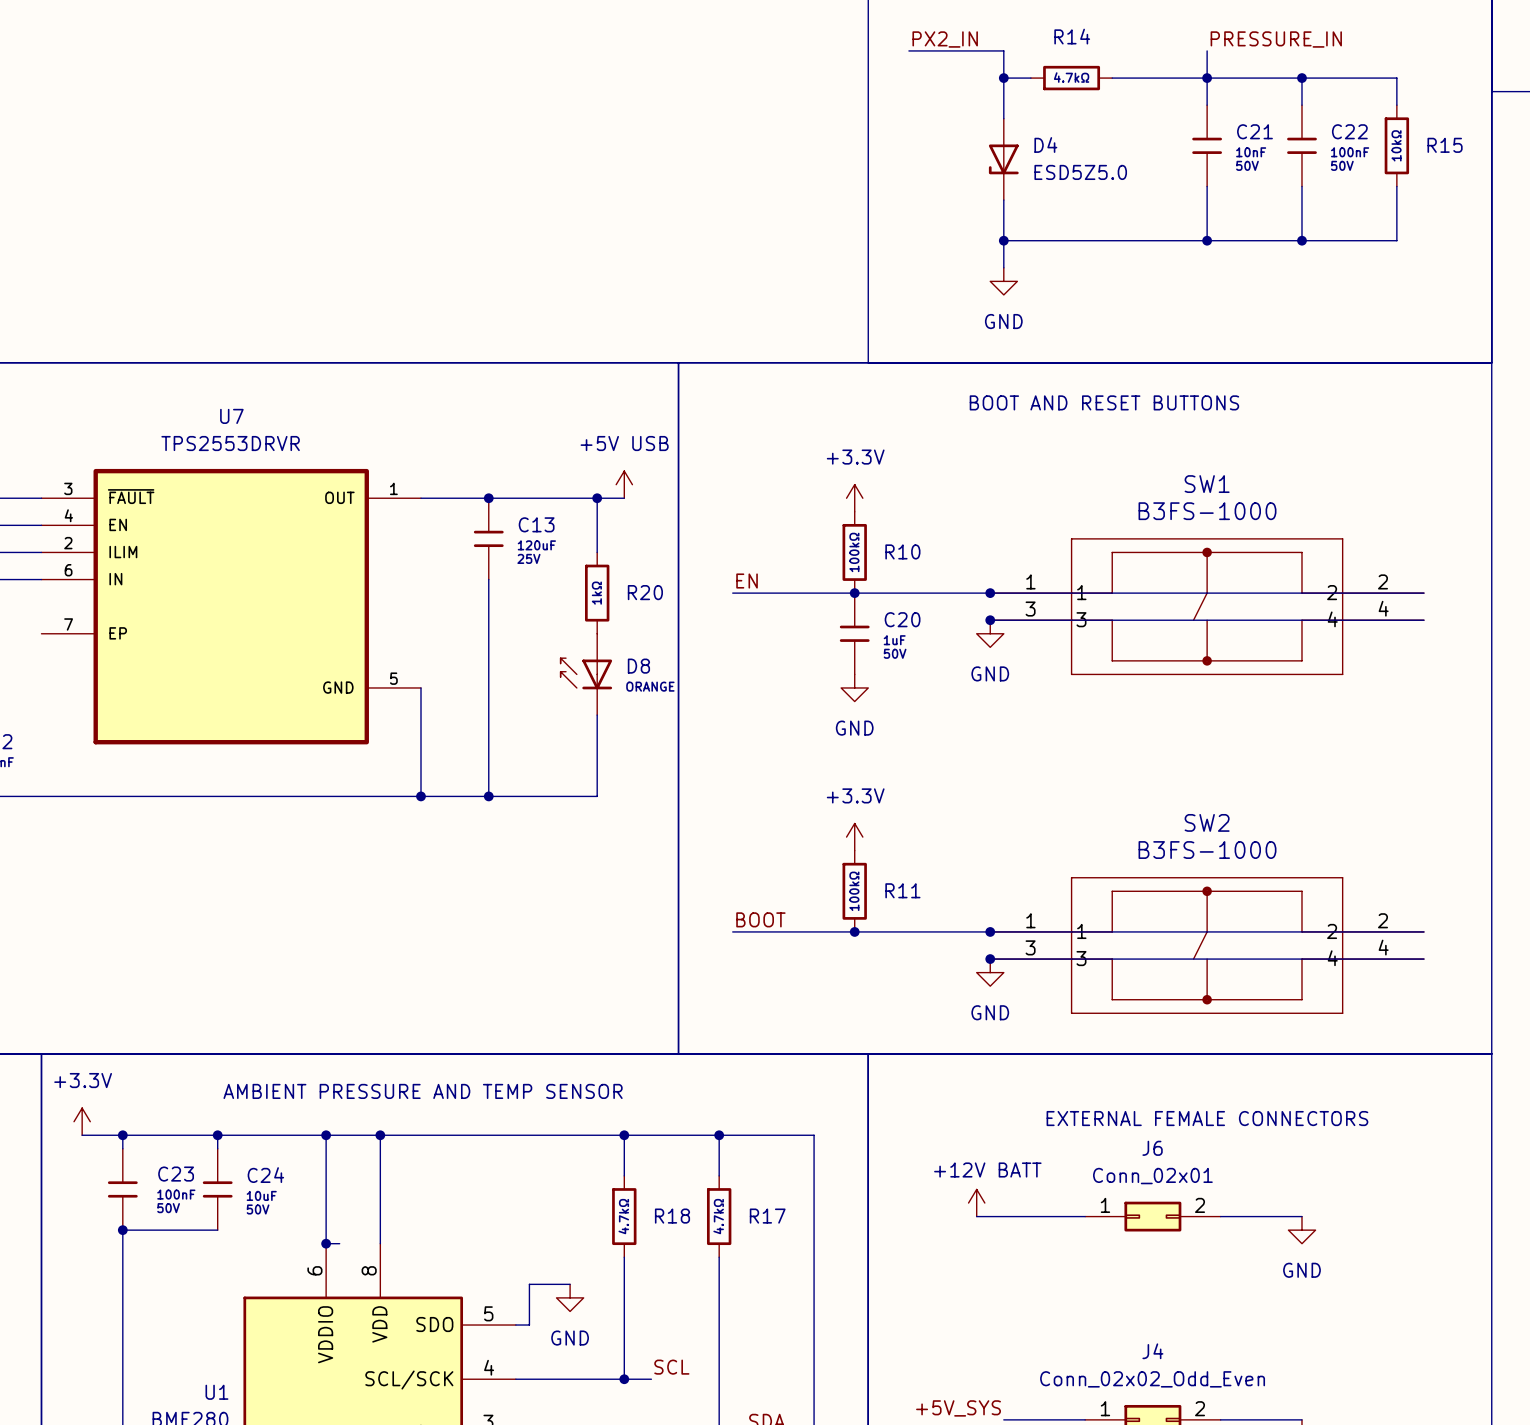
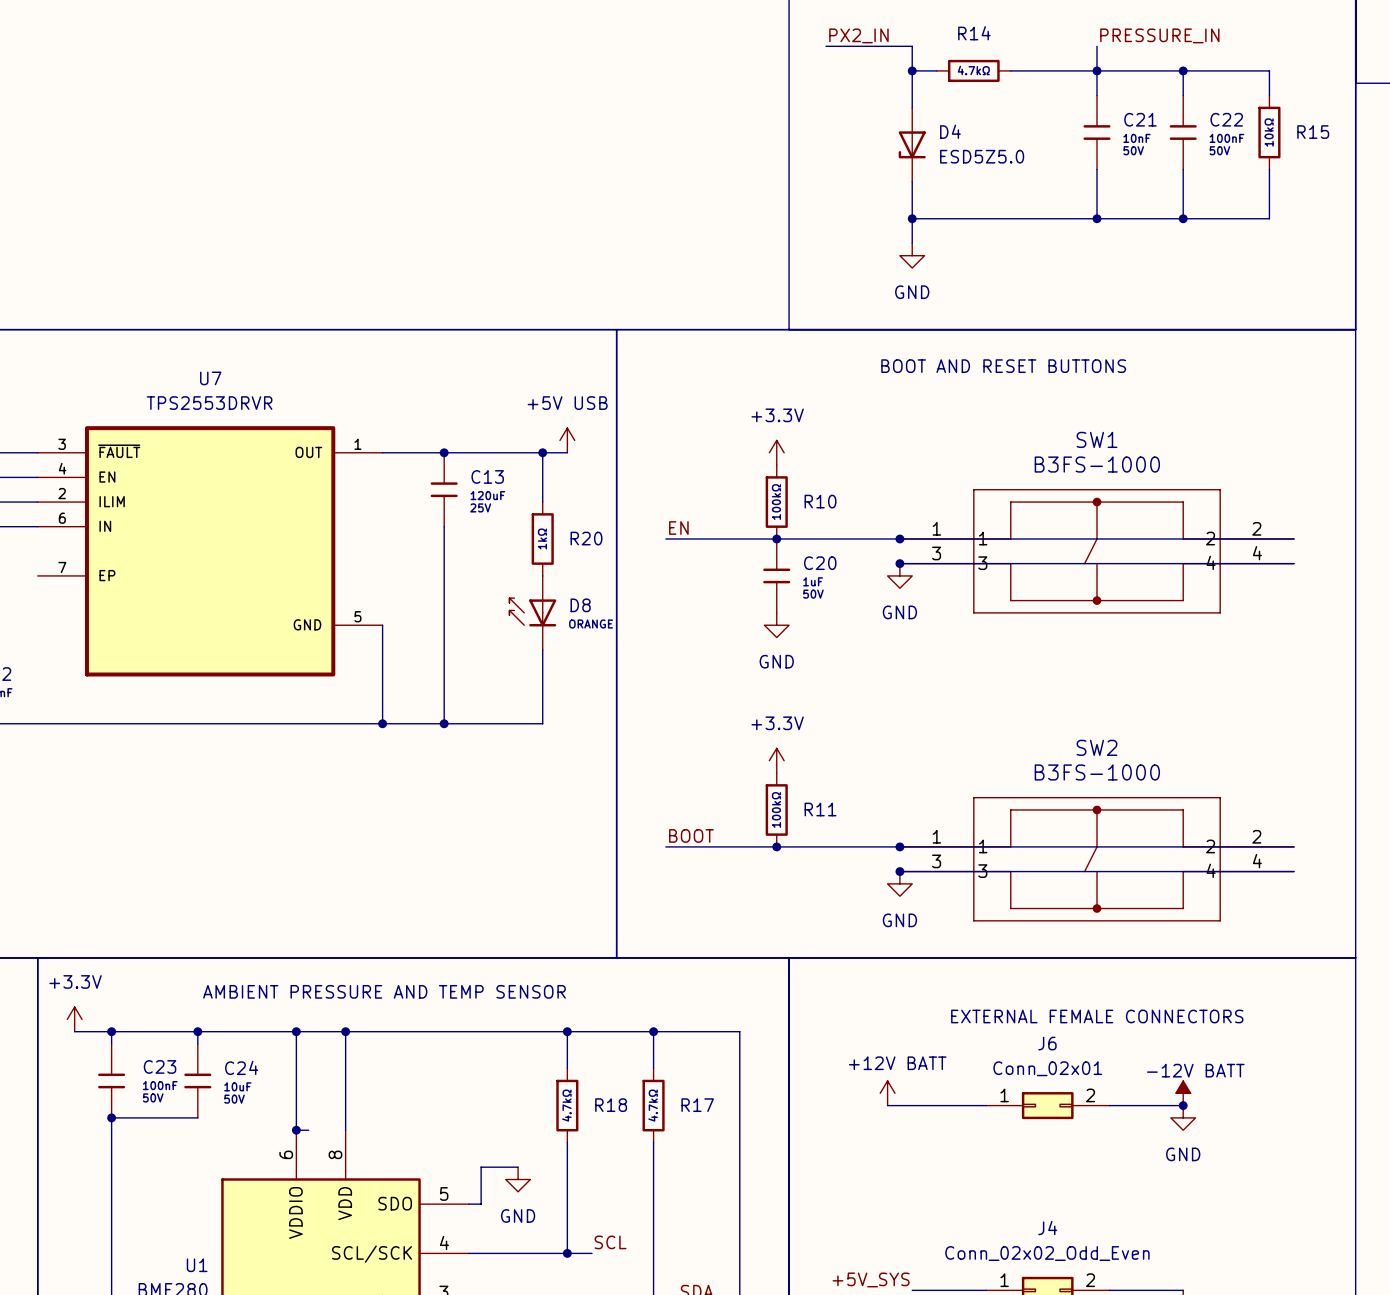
power symbol: none -> -12V BATT (1183, 1093)
junction: none -> (1183, 1105)

